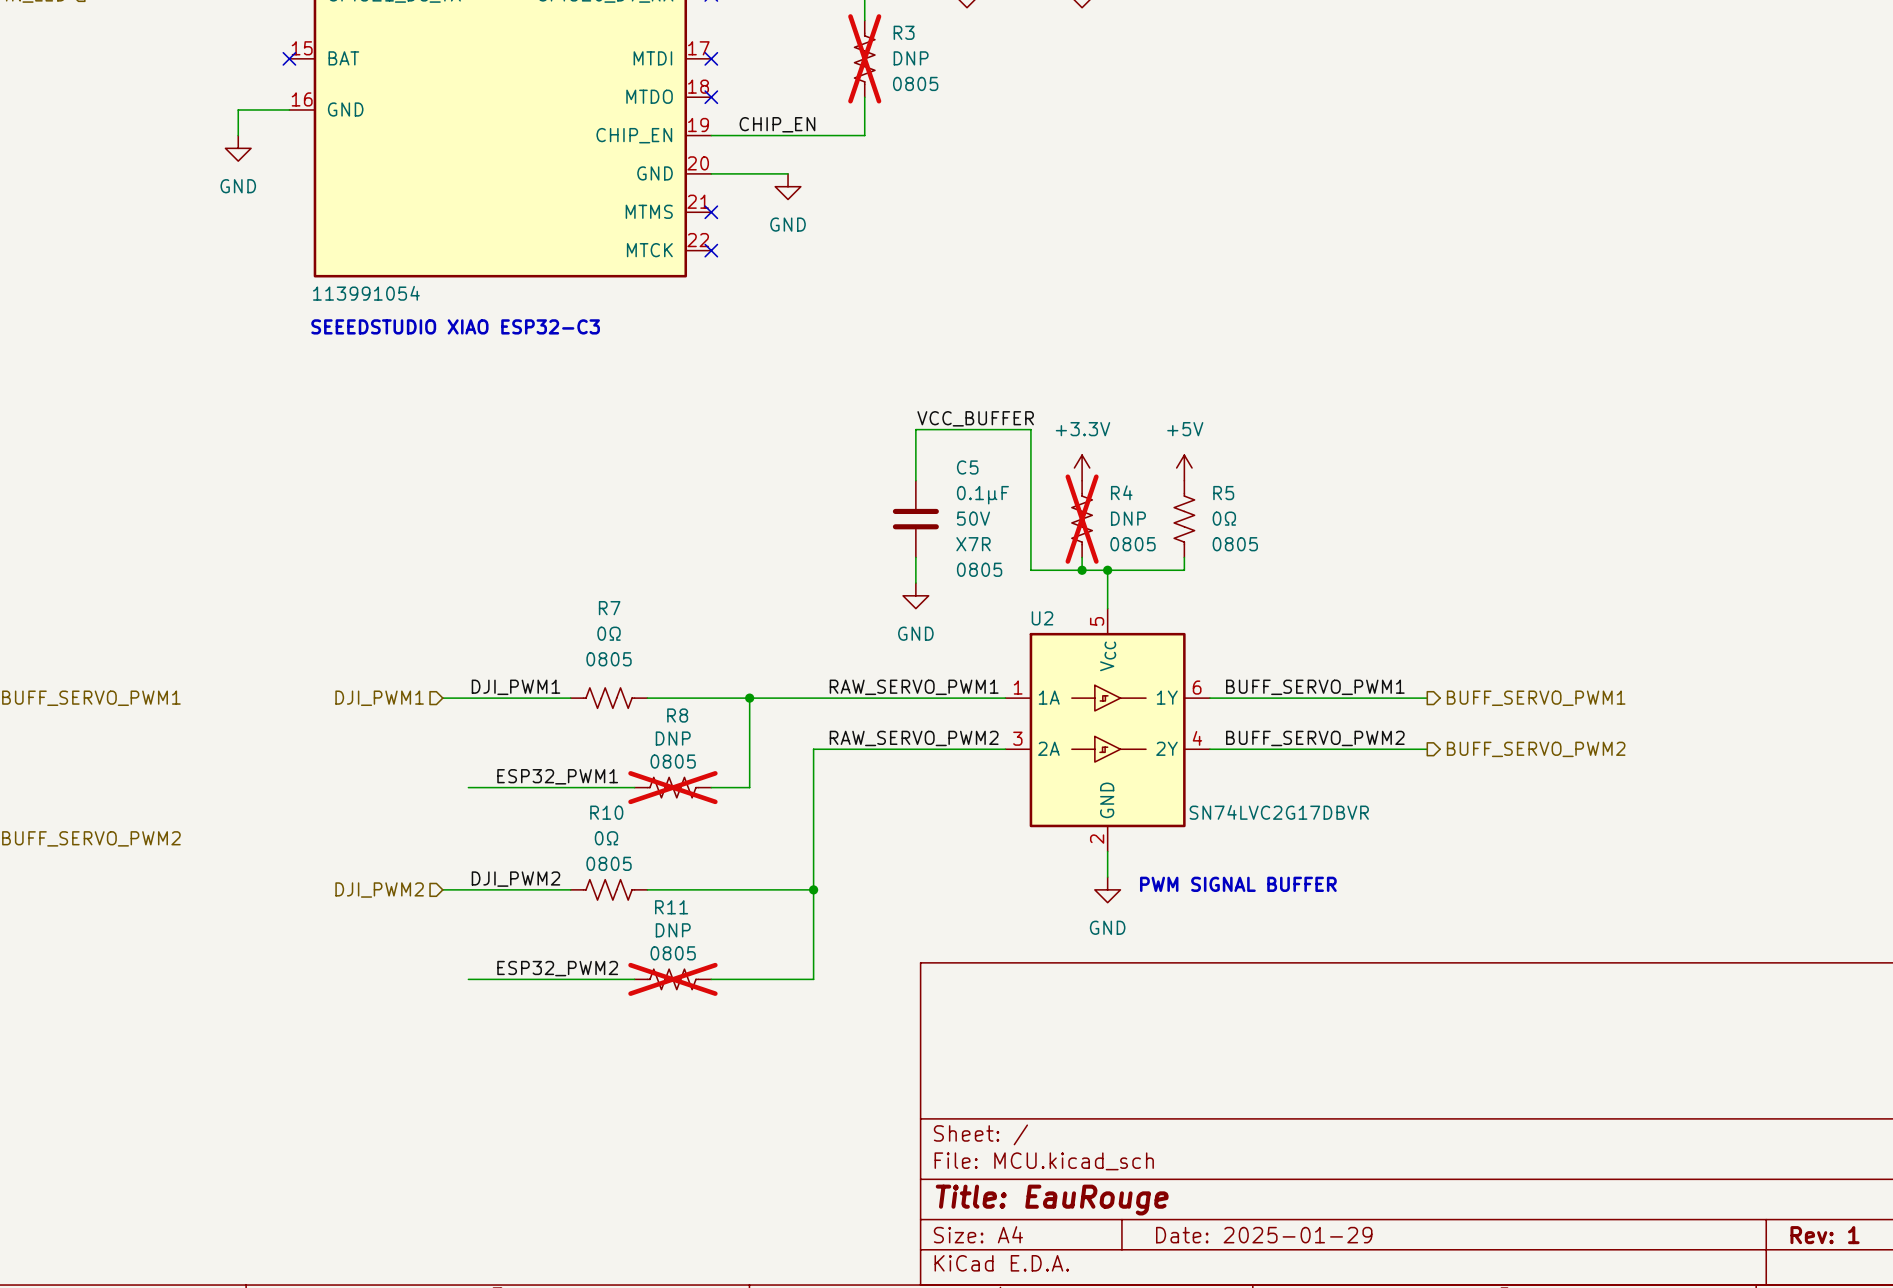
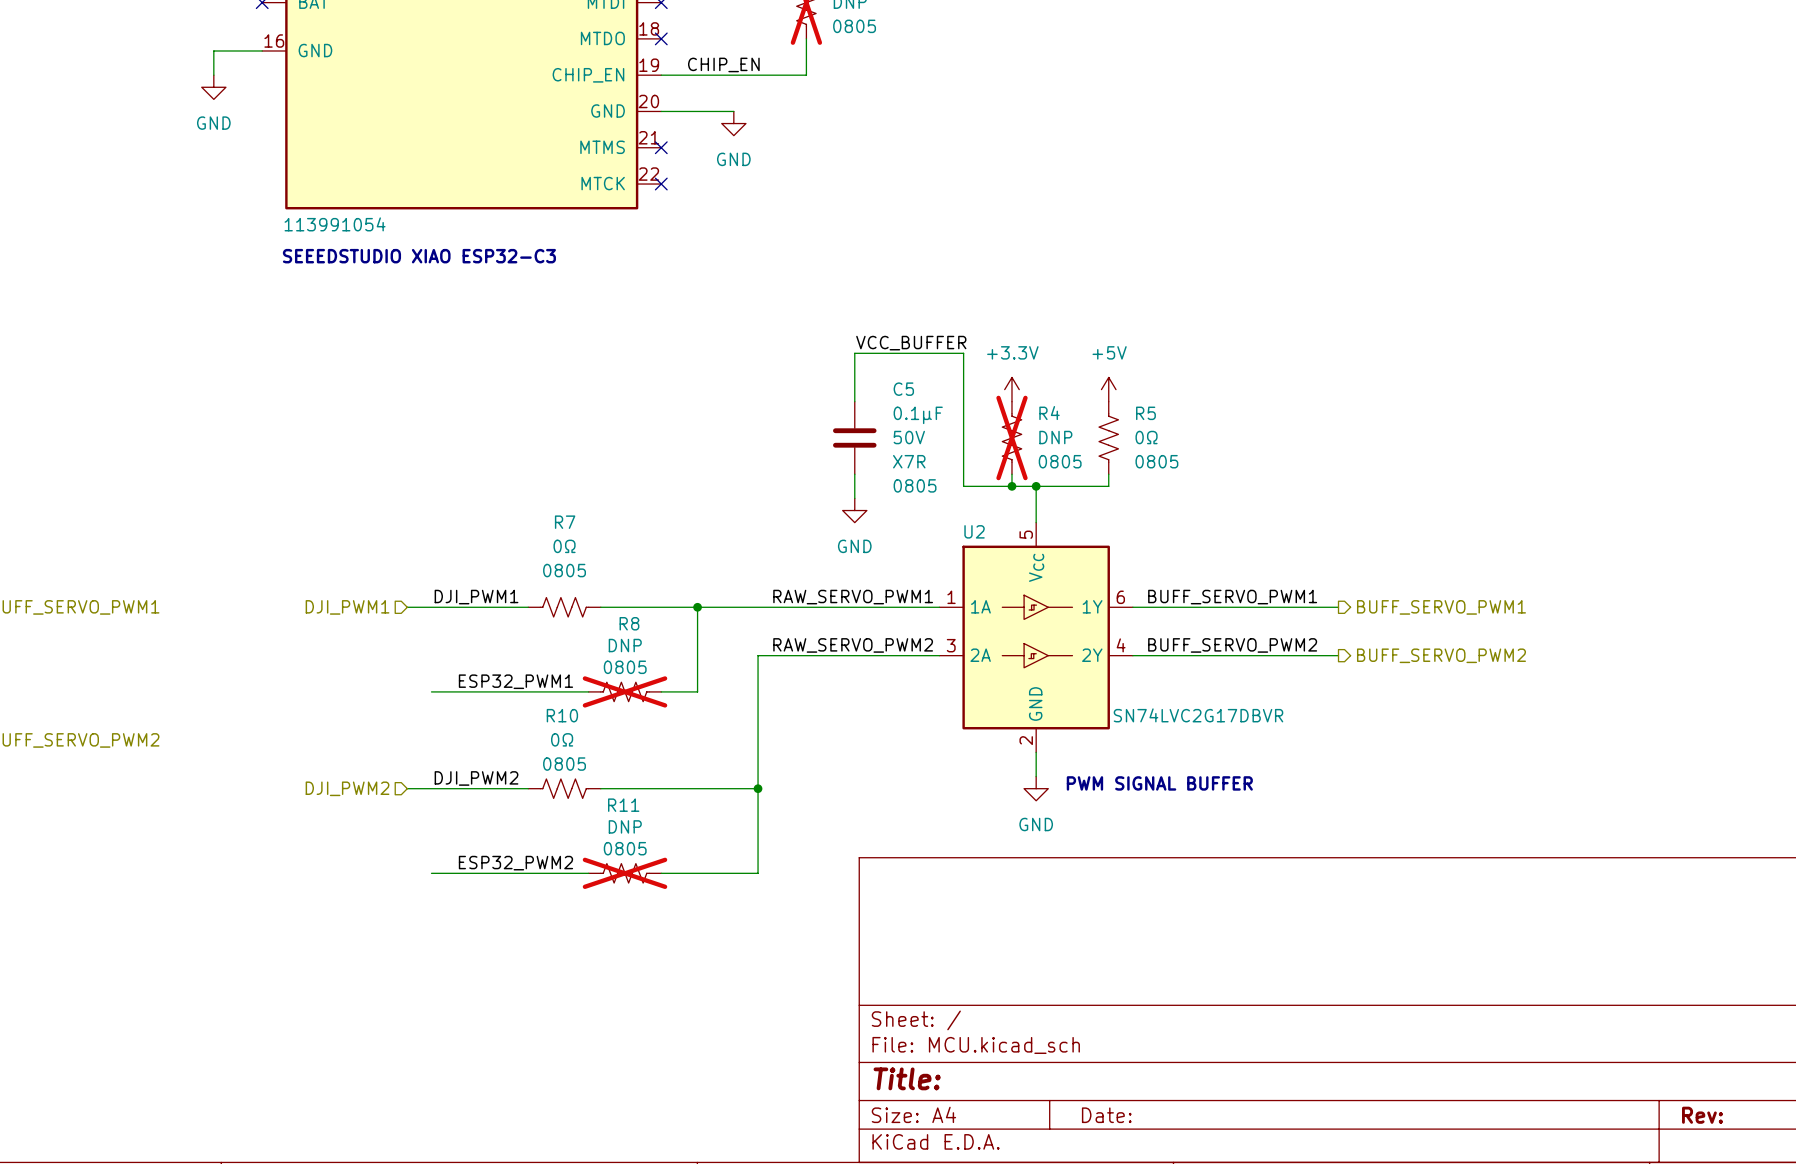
title block: Title: EauRouge (1052, 1200) -> Title: (907, 1078)
title block: Date: 2025-01-29 (1264, 1235) -> Date: (1106, 1115)
title block: Rev: 1 (1825, 1235) -> Rev: (1702, 1115)

